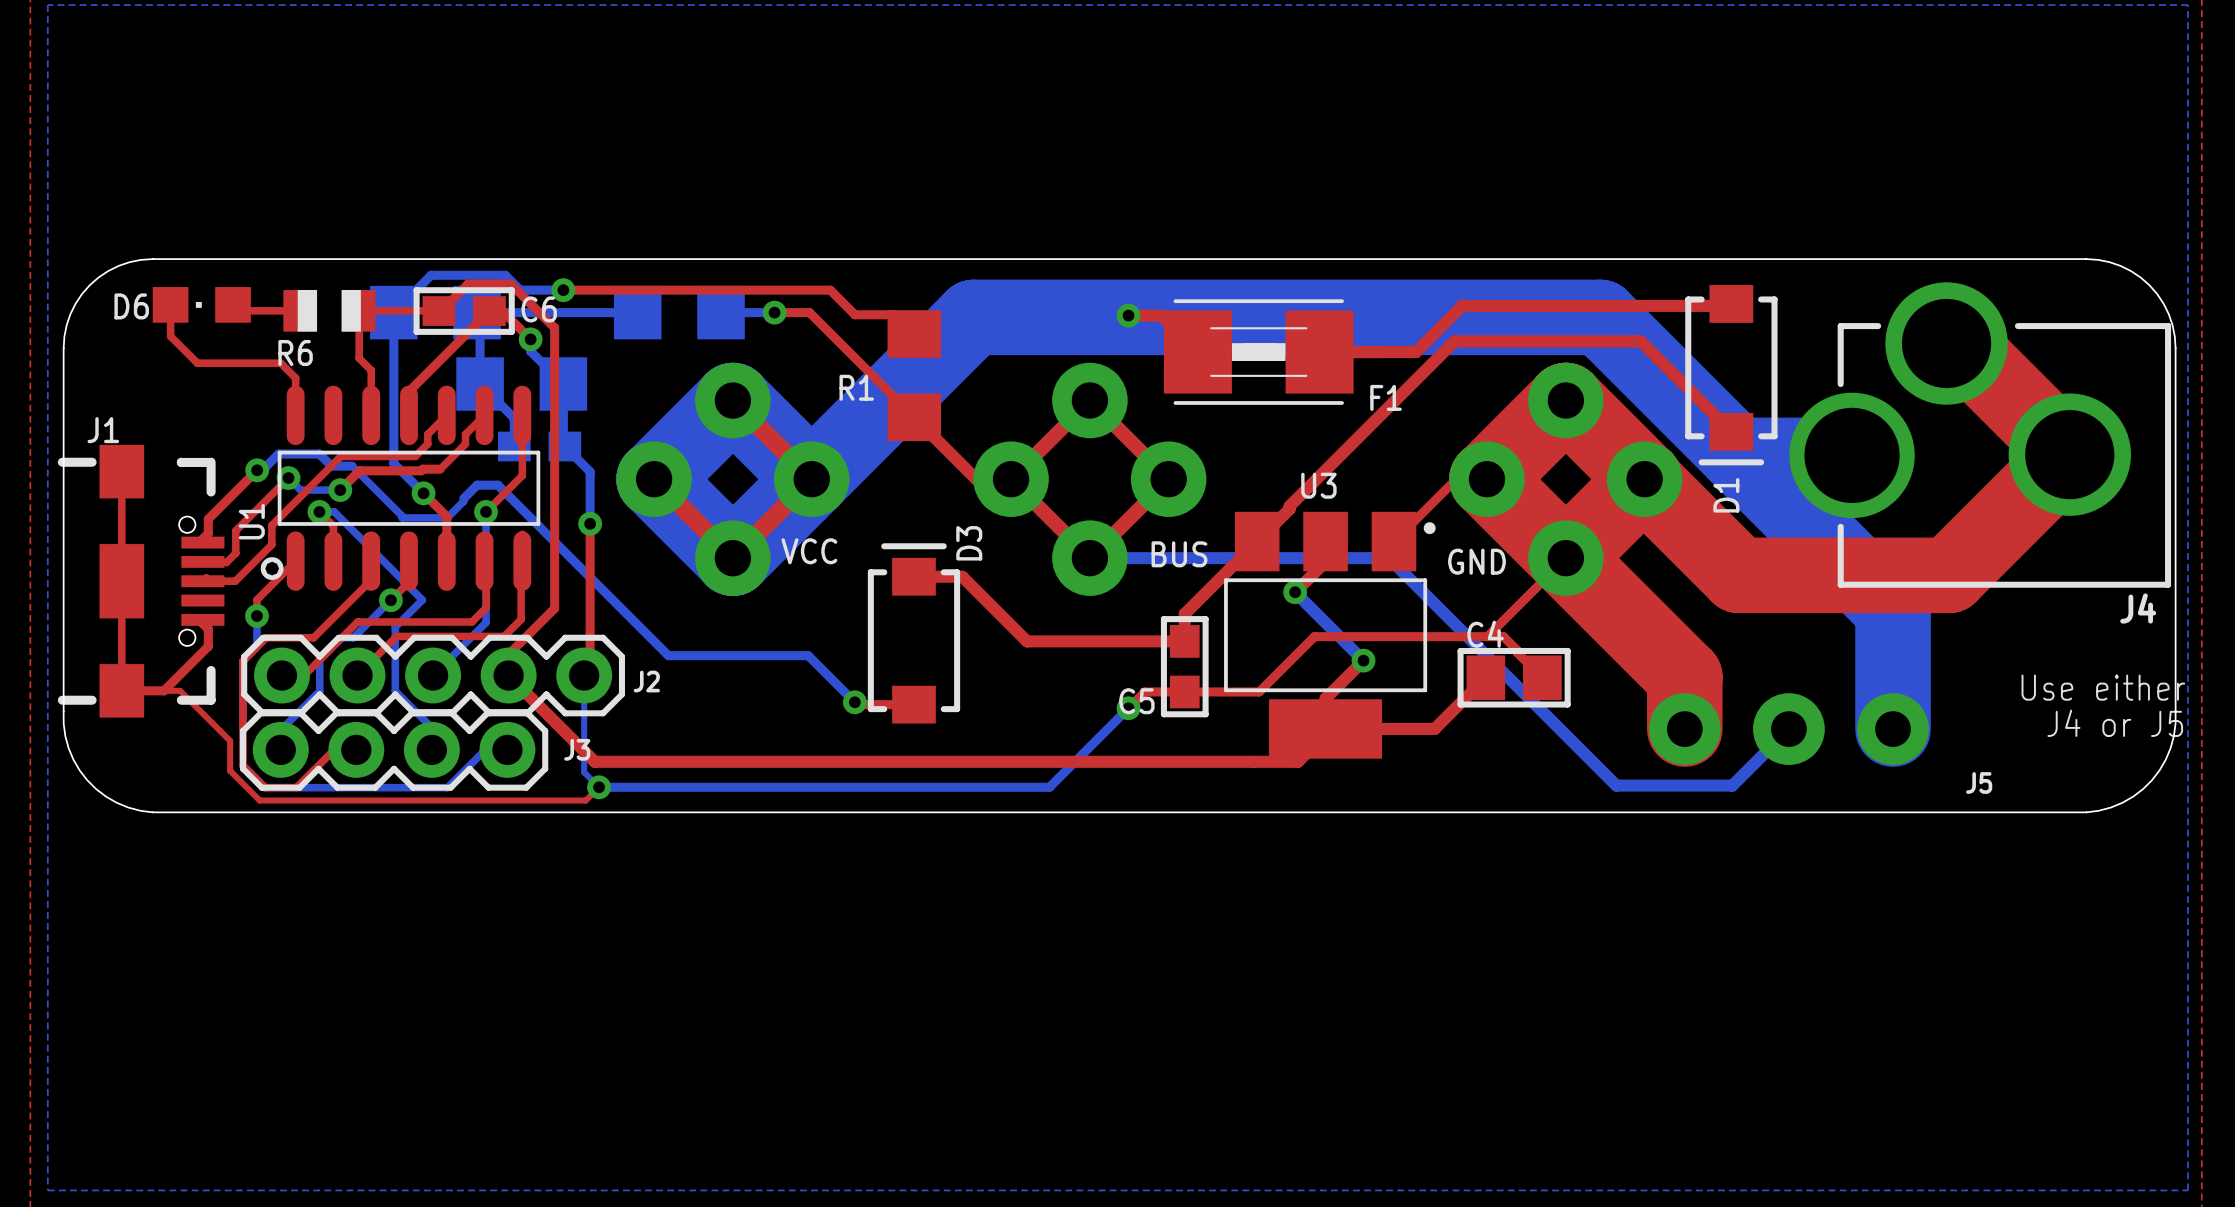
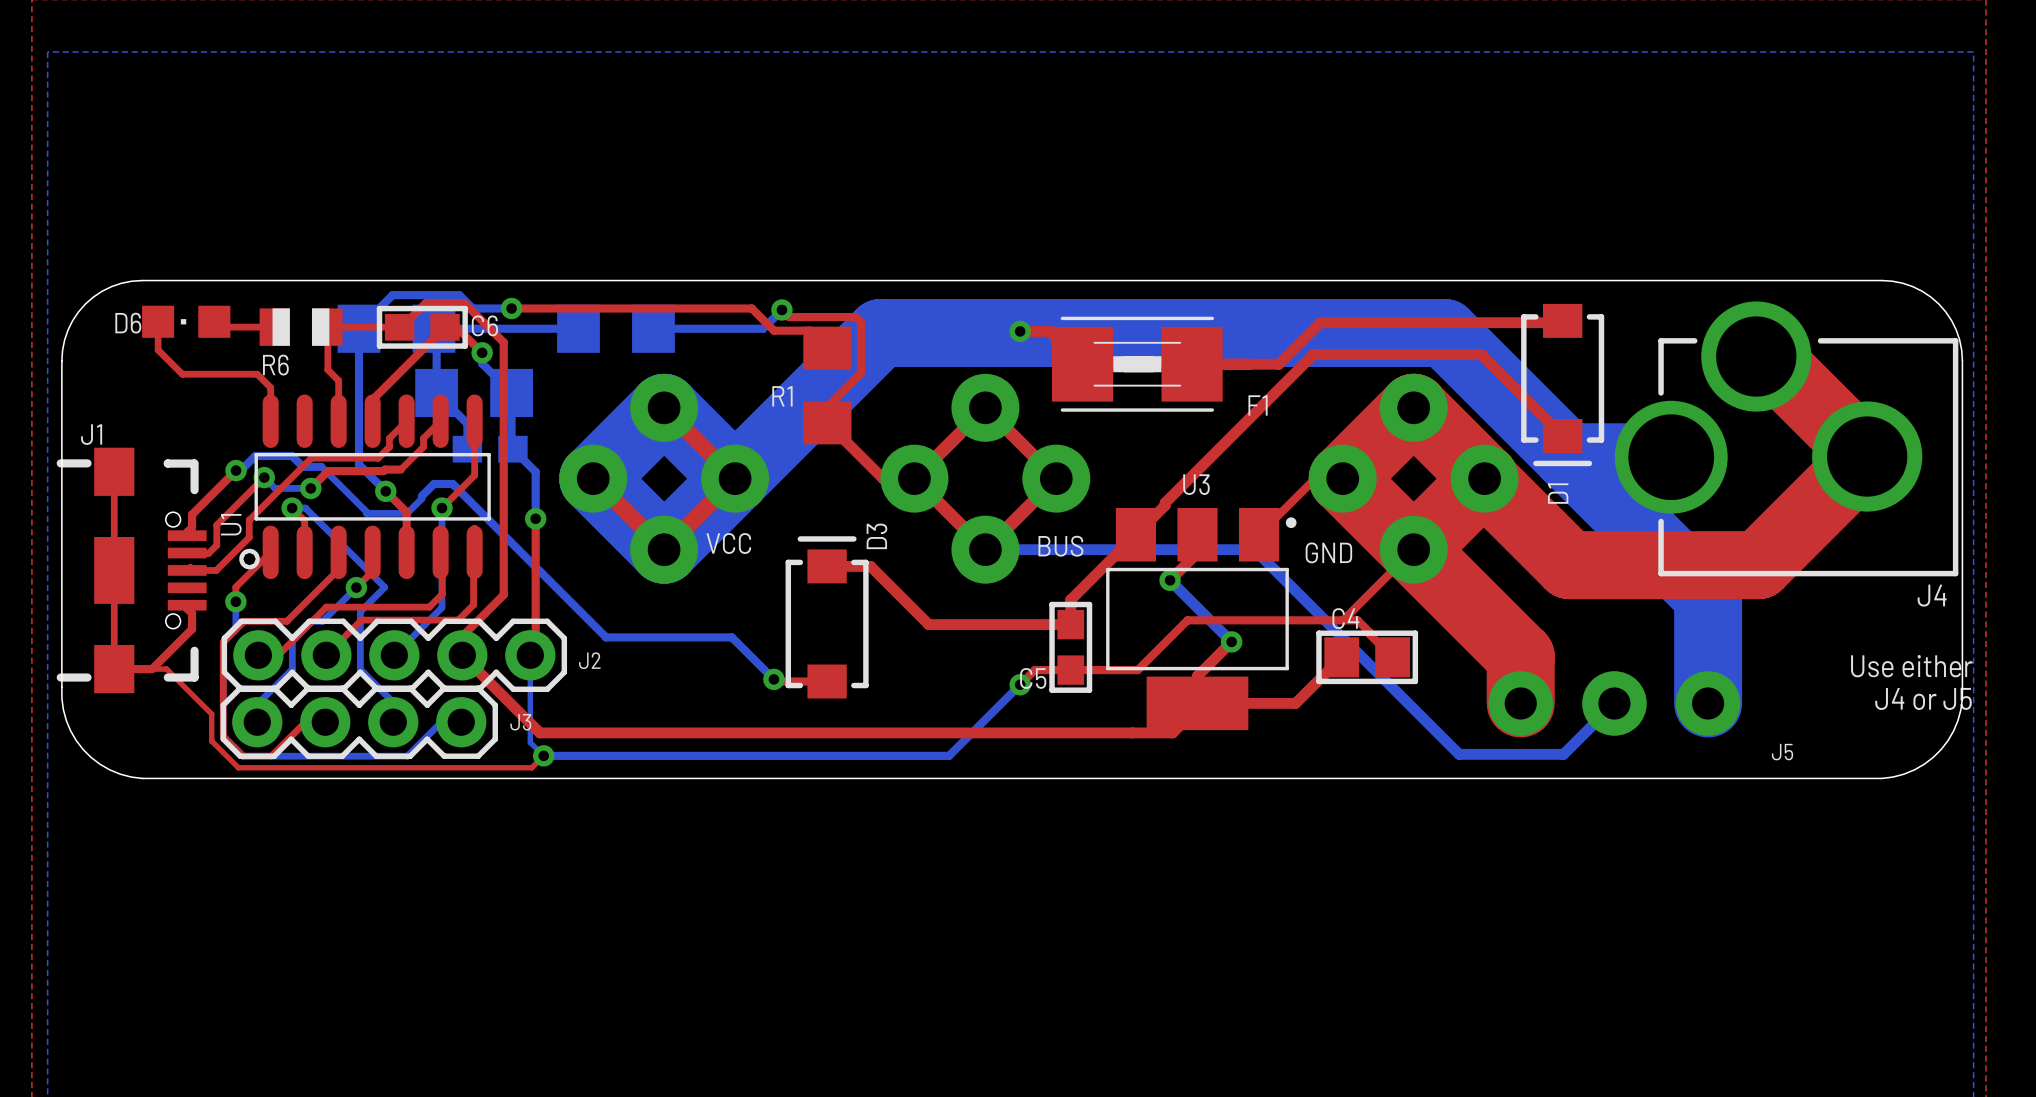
top track: none -> (781, 309) (789, 317) (855, 317) (861, 322) (861, 373) (832, 401) (832, 428)
bottom track: none -> (781, 309) (763, 328) (701, 328)
top track: (774, 312) (809, 312) (914, 417) -> none
via position: (774, 312) -> (781, 309)

